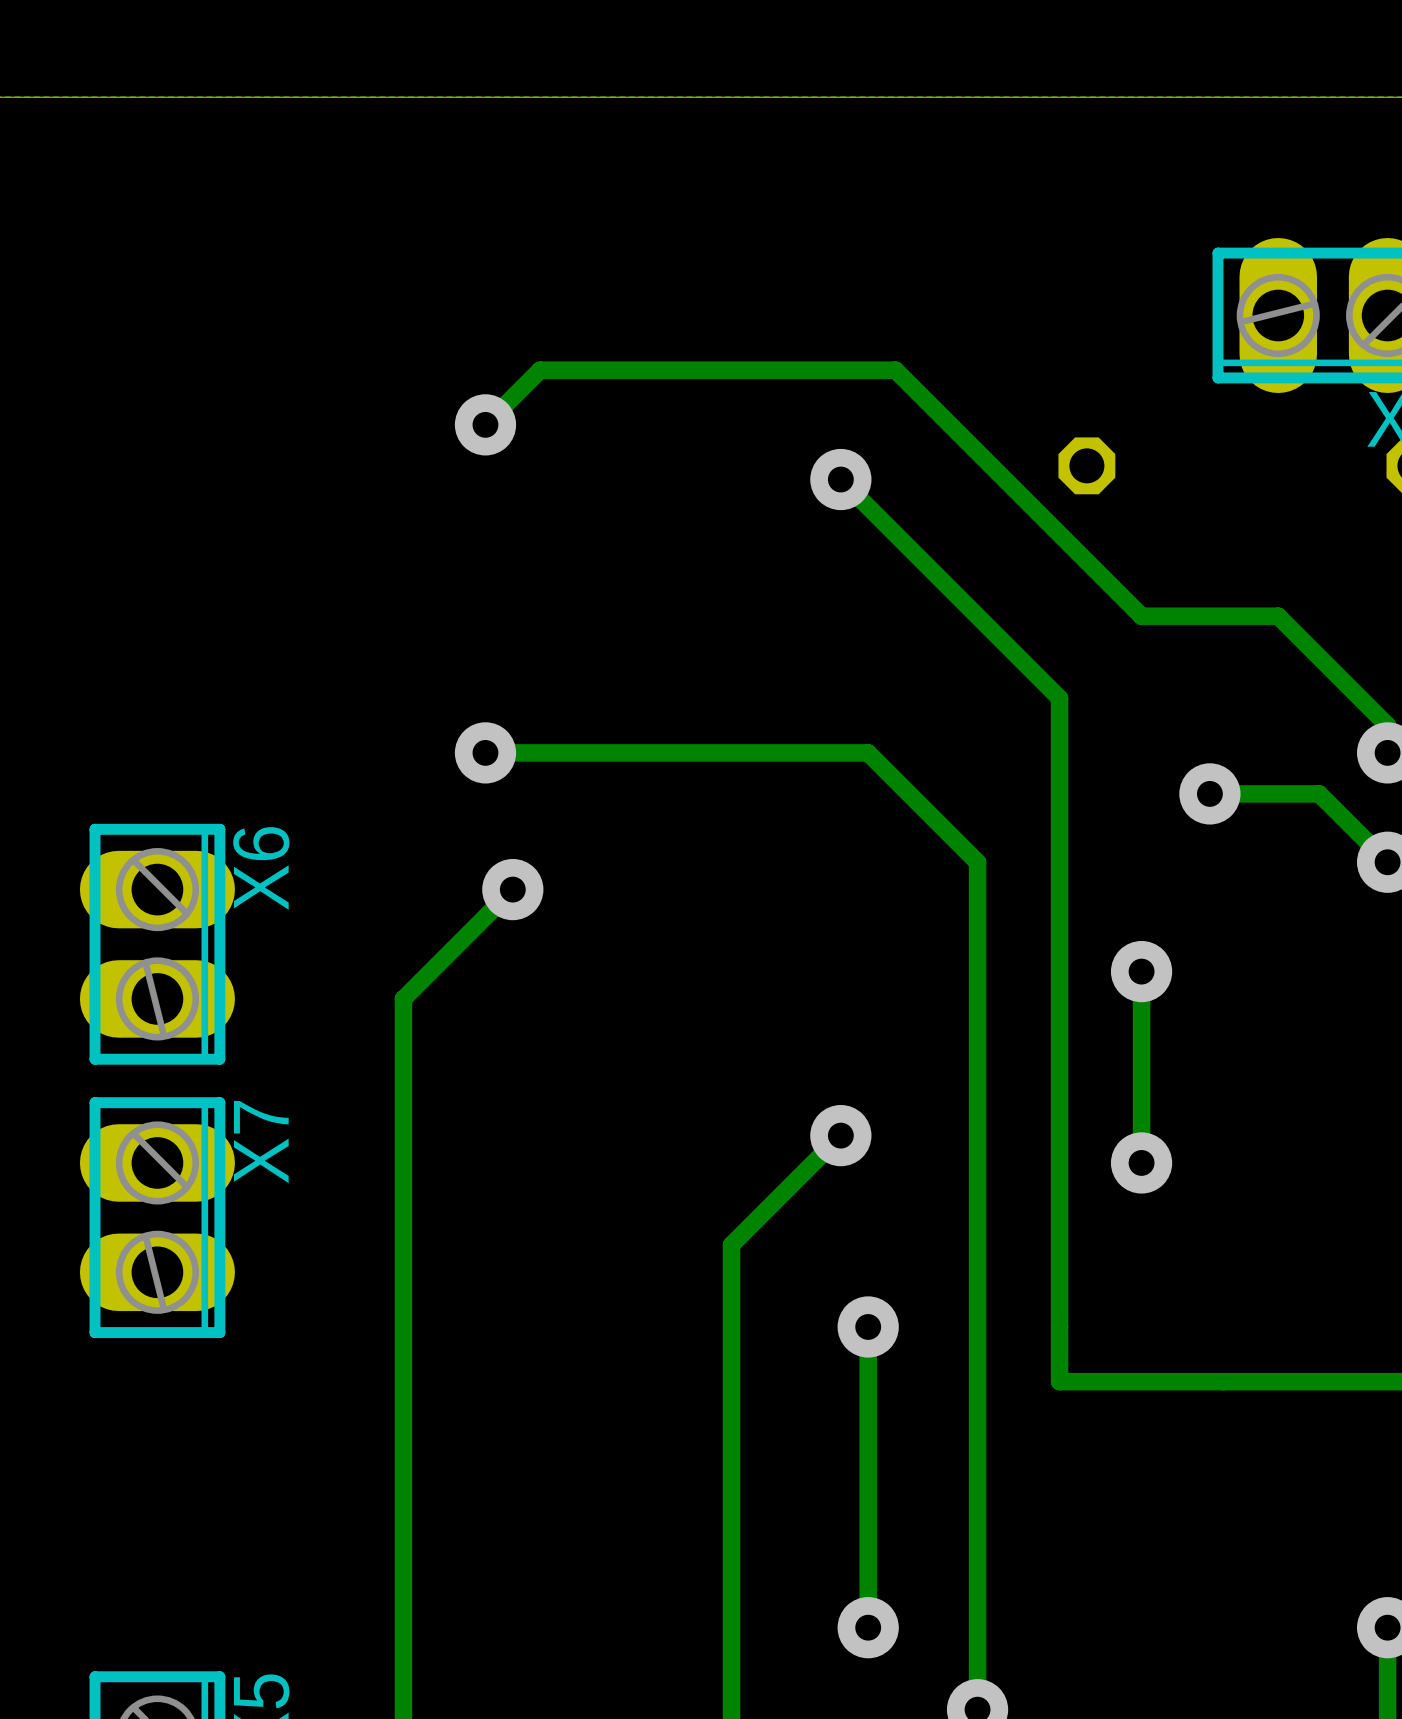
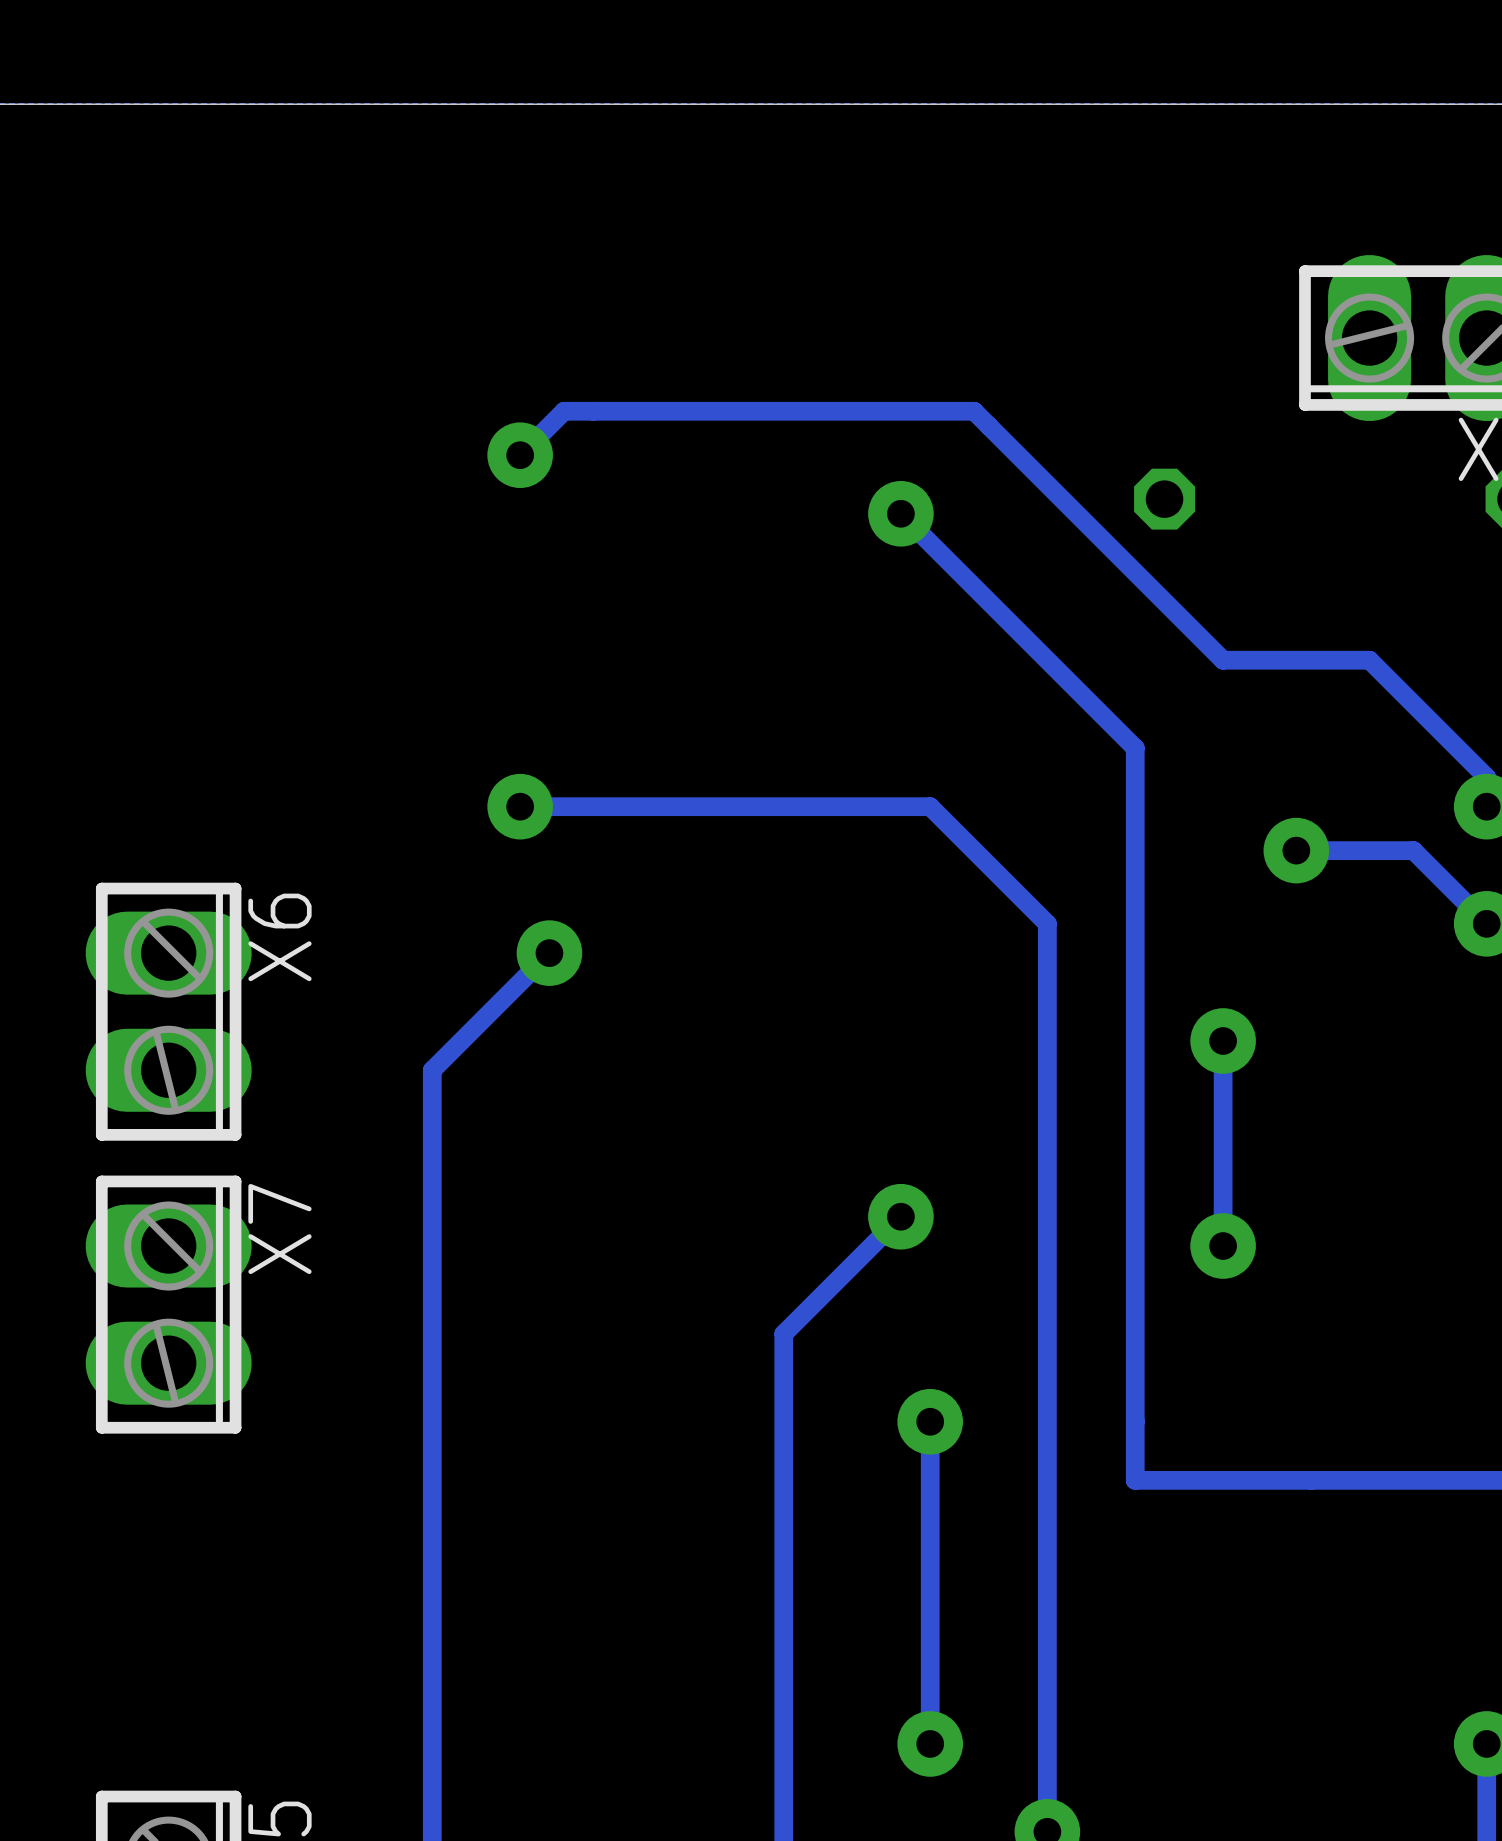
track: (909, 383) (895, 370) (540, 370) (526, 383) -> (974, 411) (564, 411)

